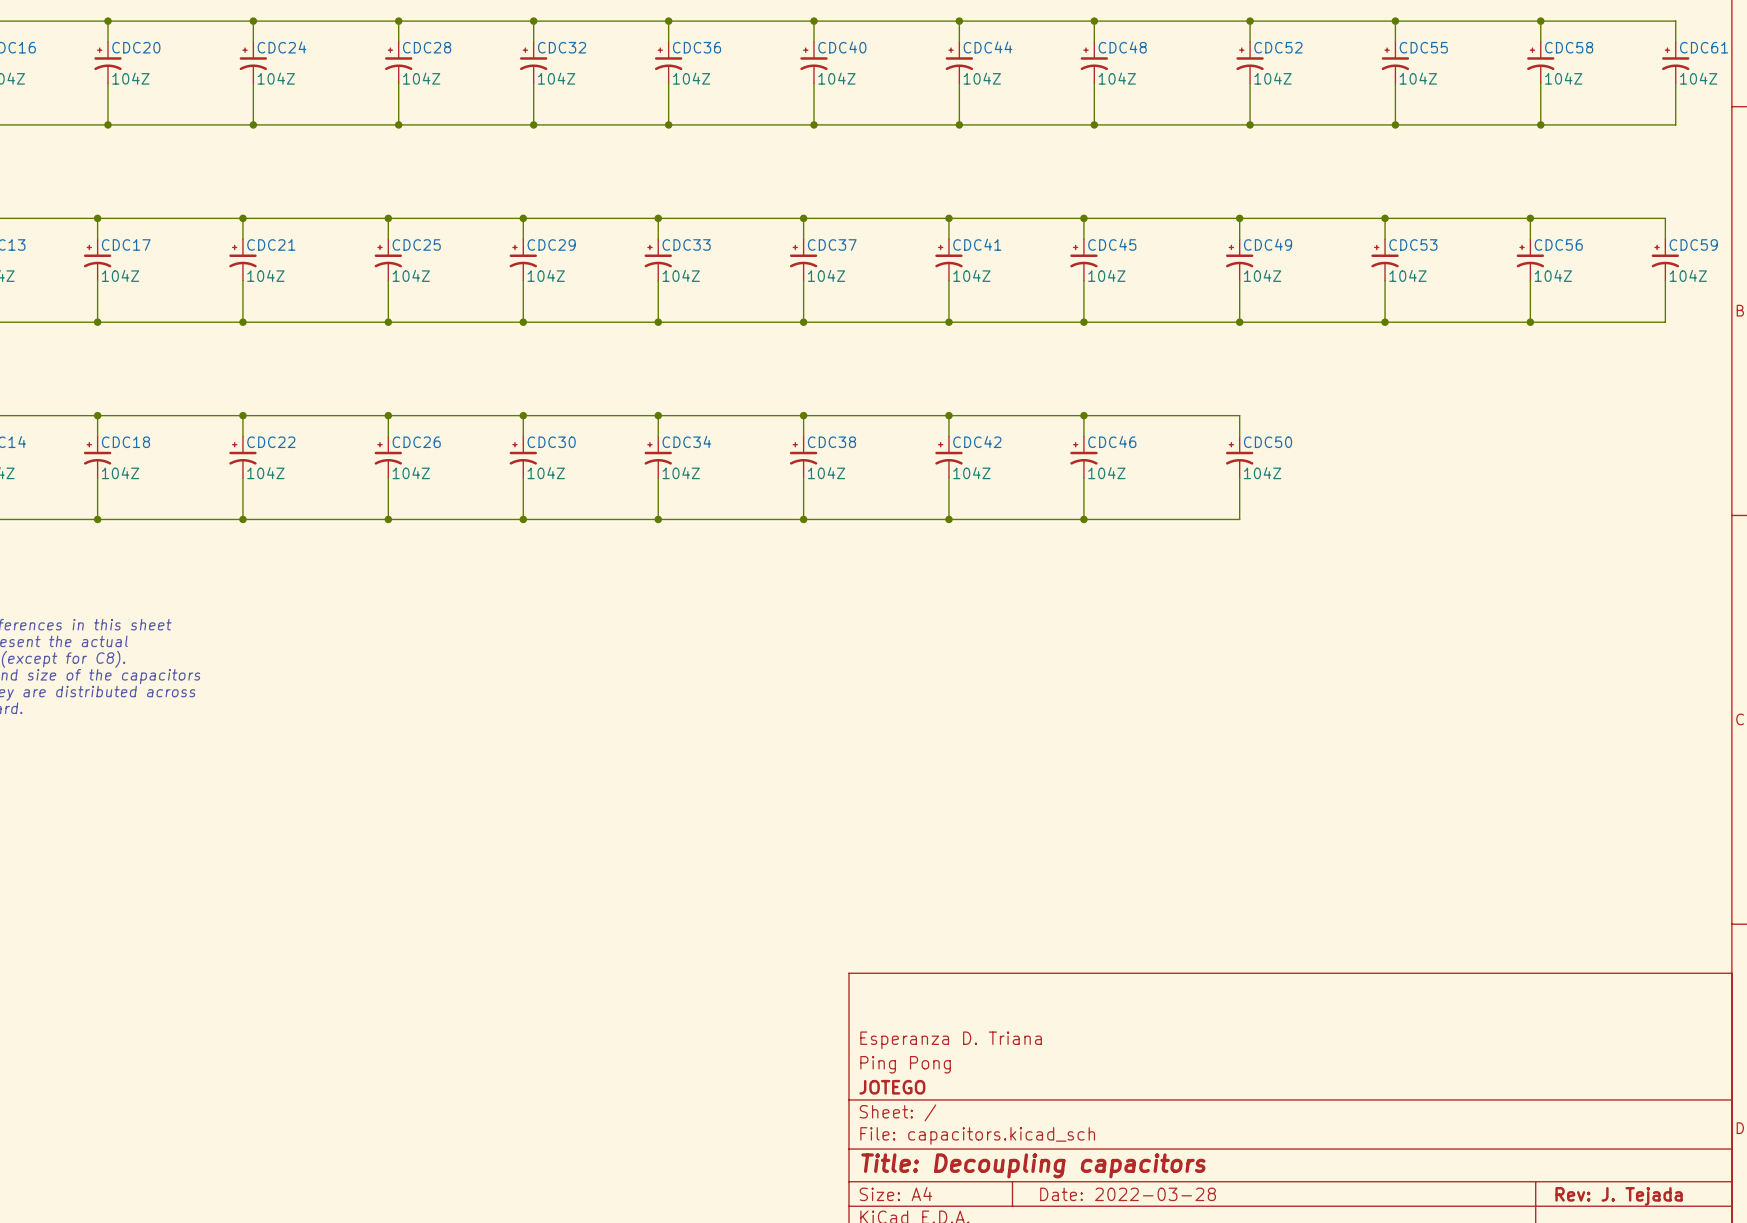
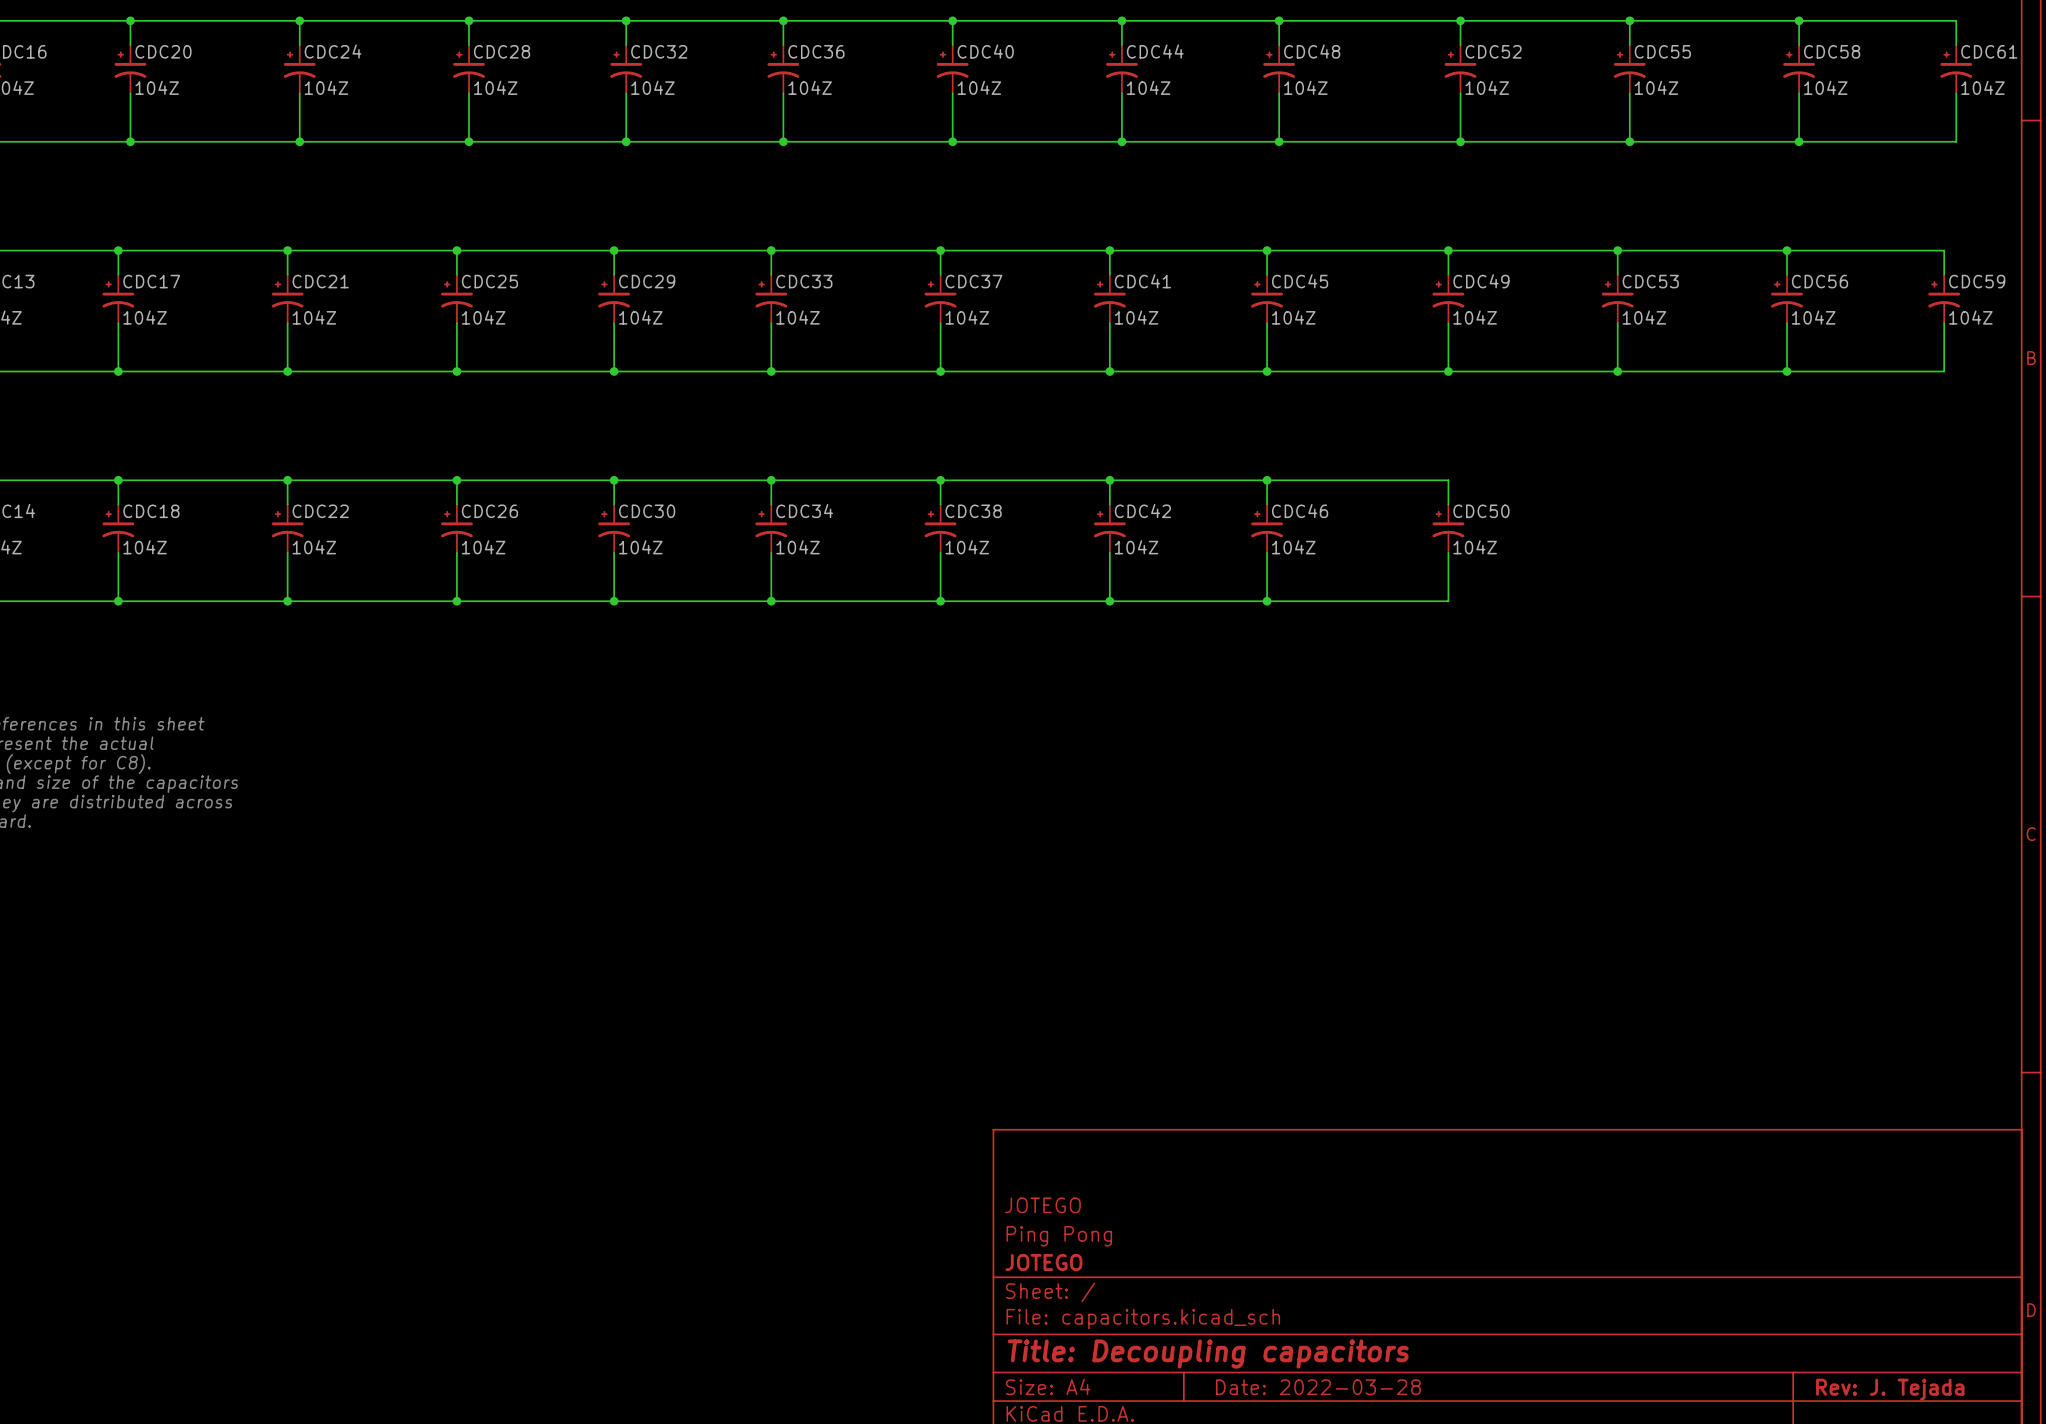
title block: Esperanza D. Triana (951, 1040) -> JOTEGO (1043, 1205)

